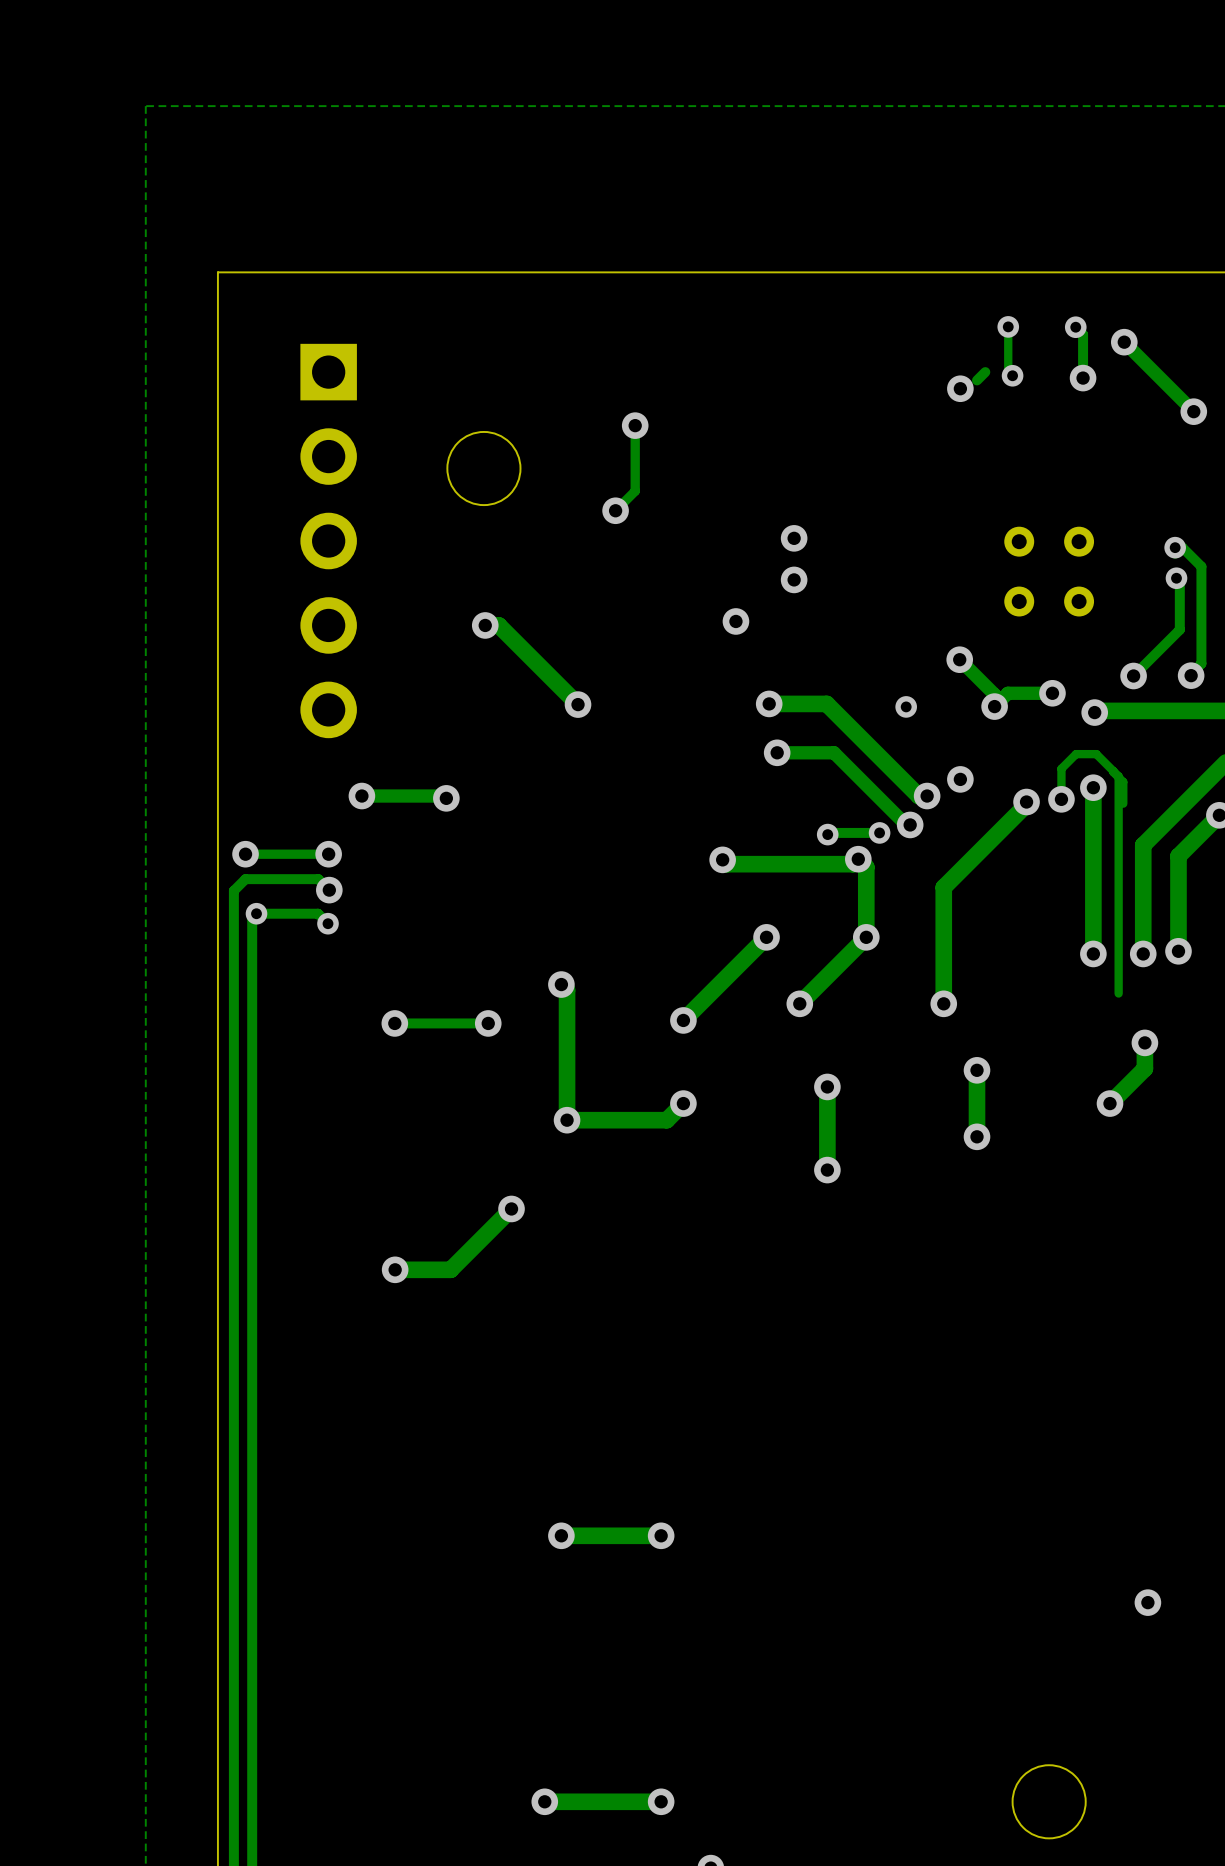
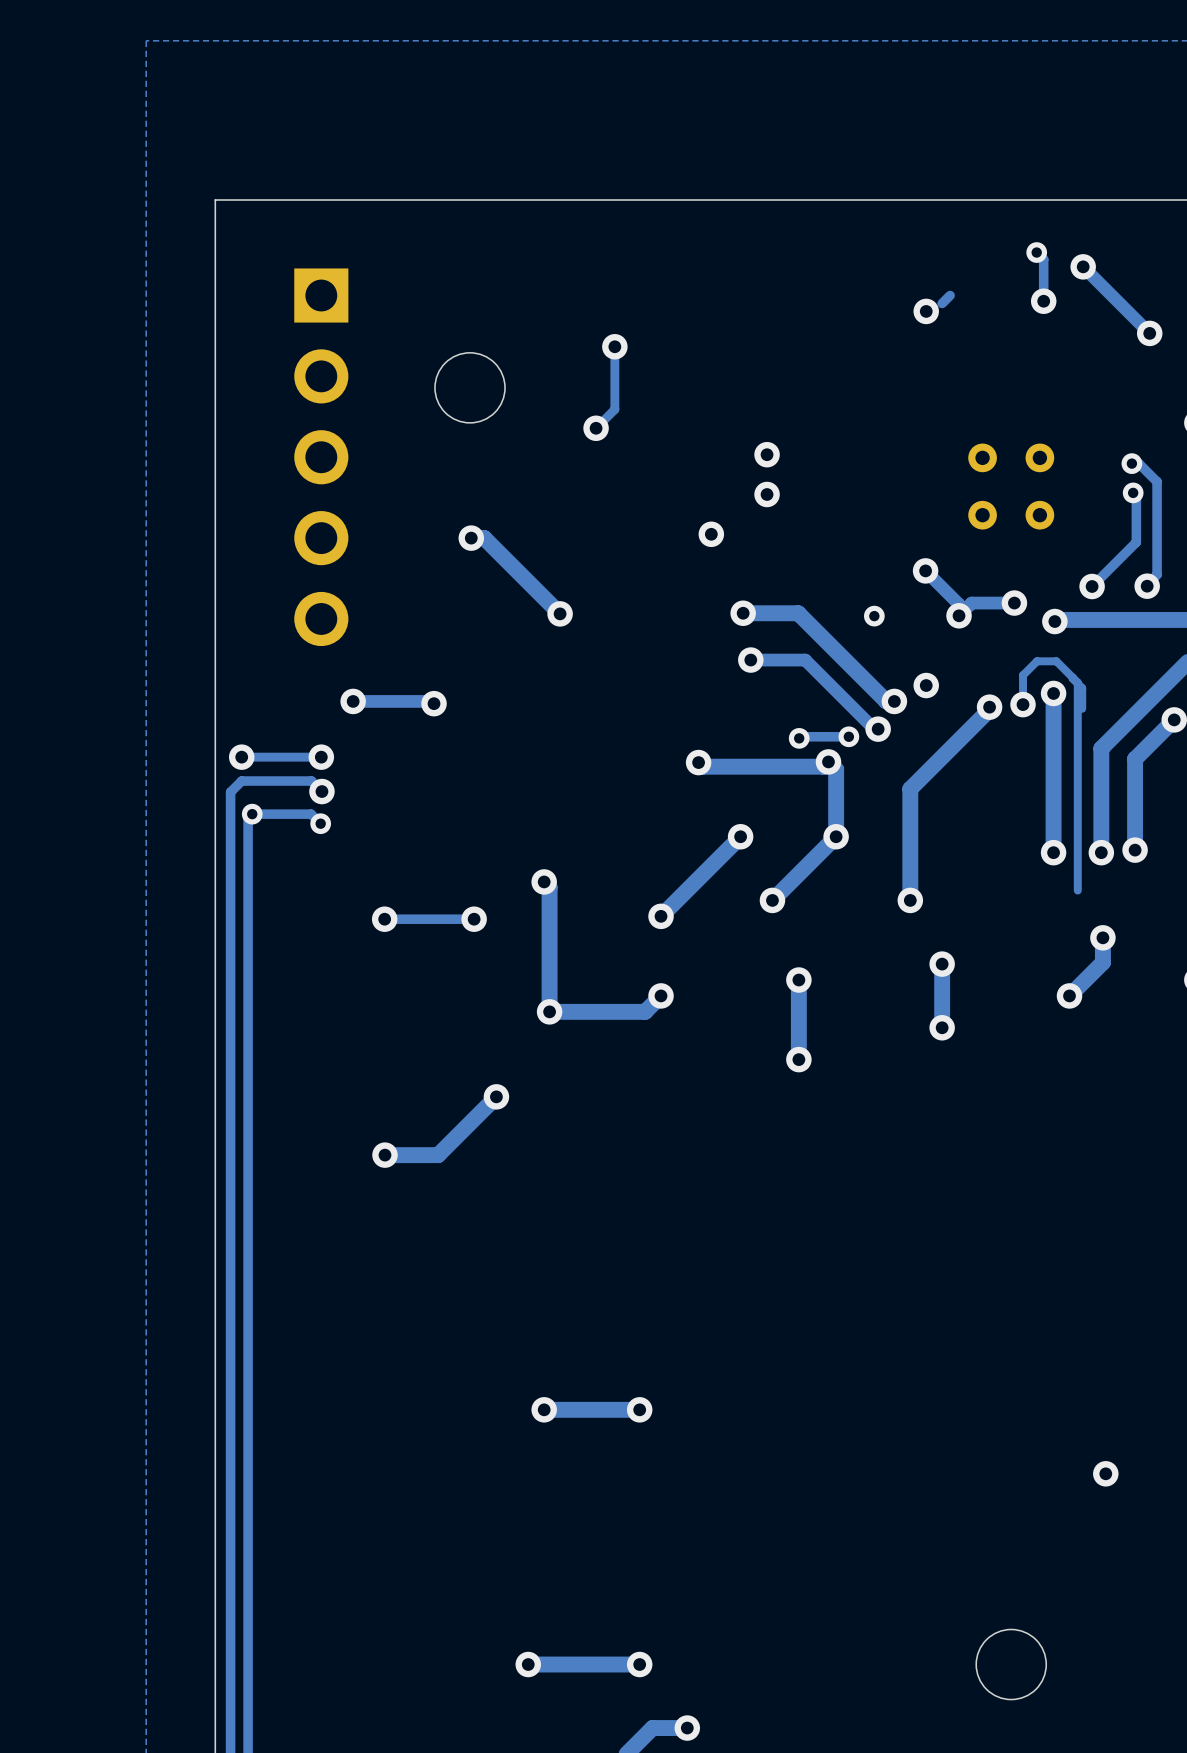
track: (1008, 326) (1008, 371) (1012, 375) -> none
via: (1008, 326) -> none
via: (1012, 375) -> none

